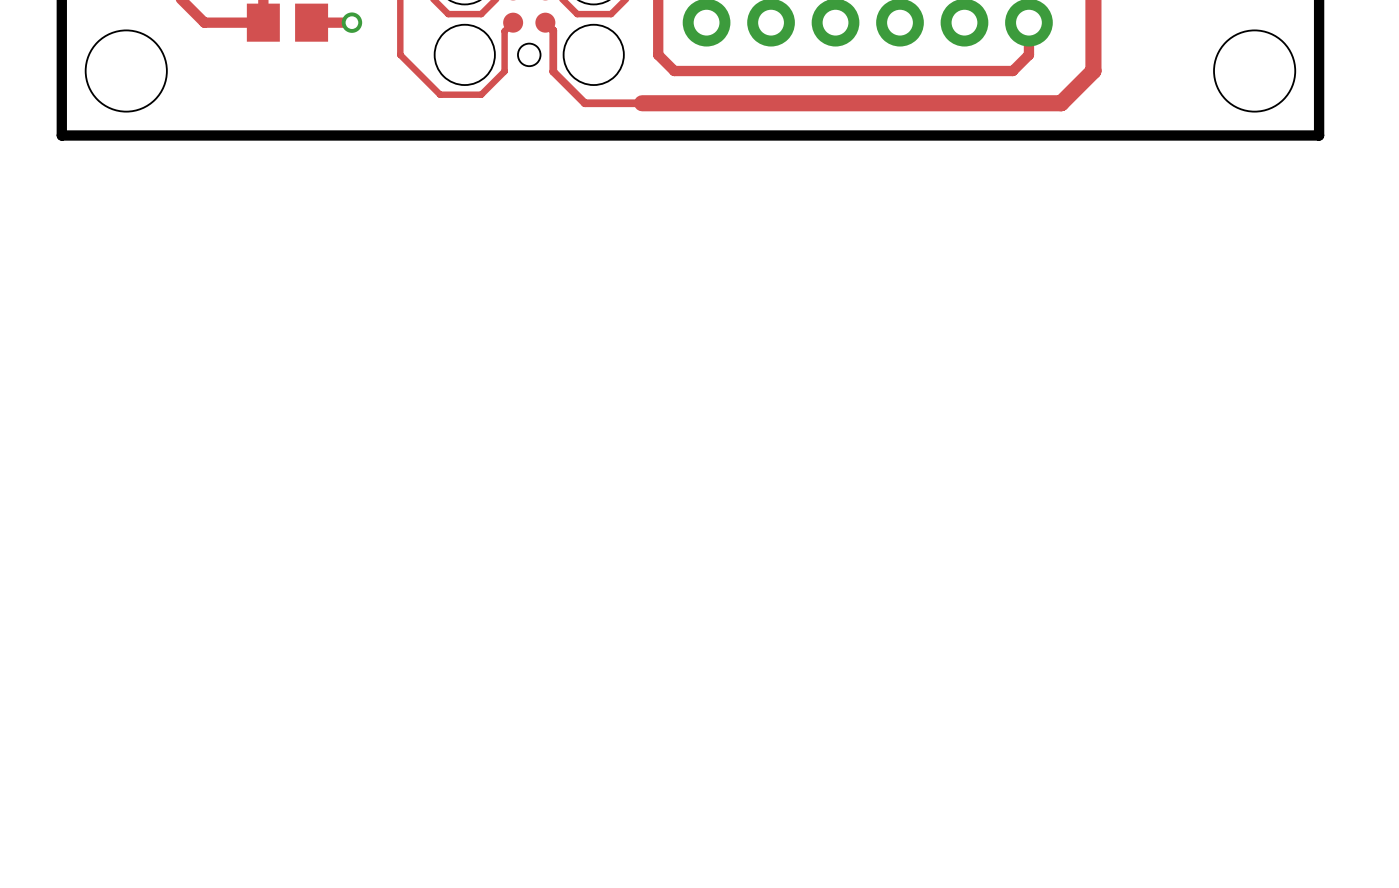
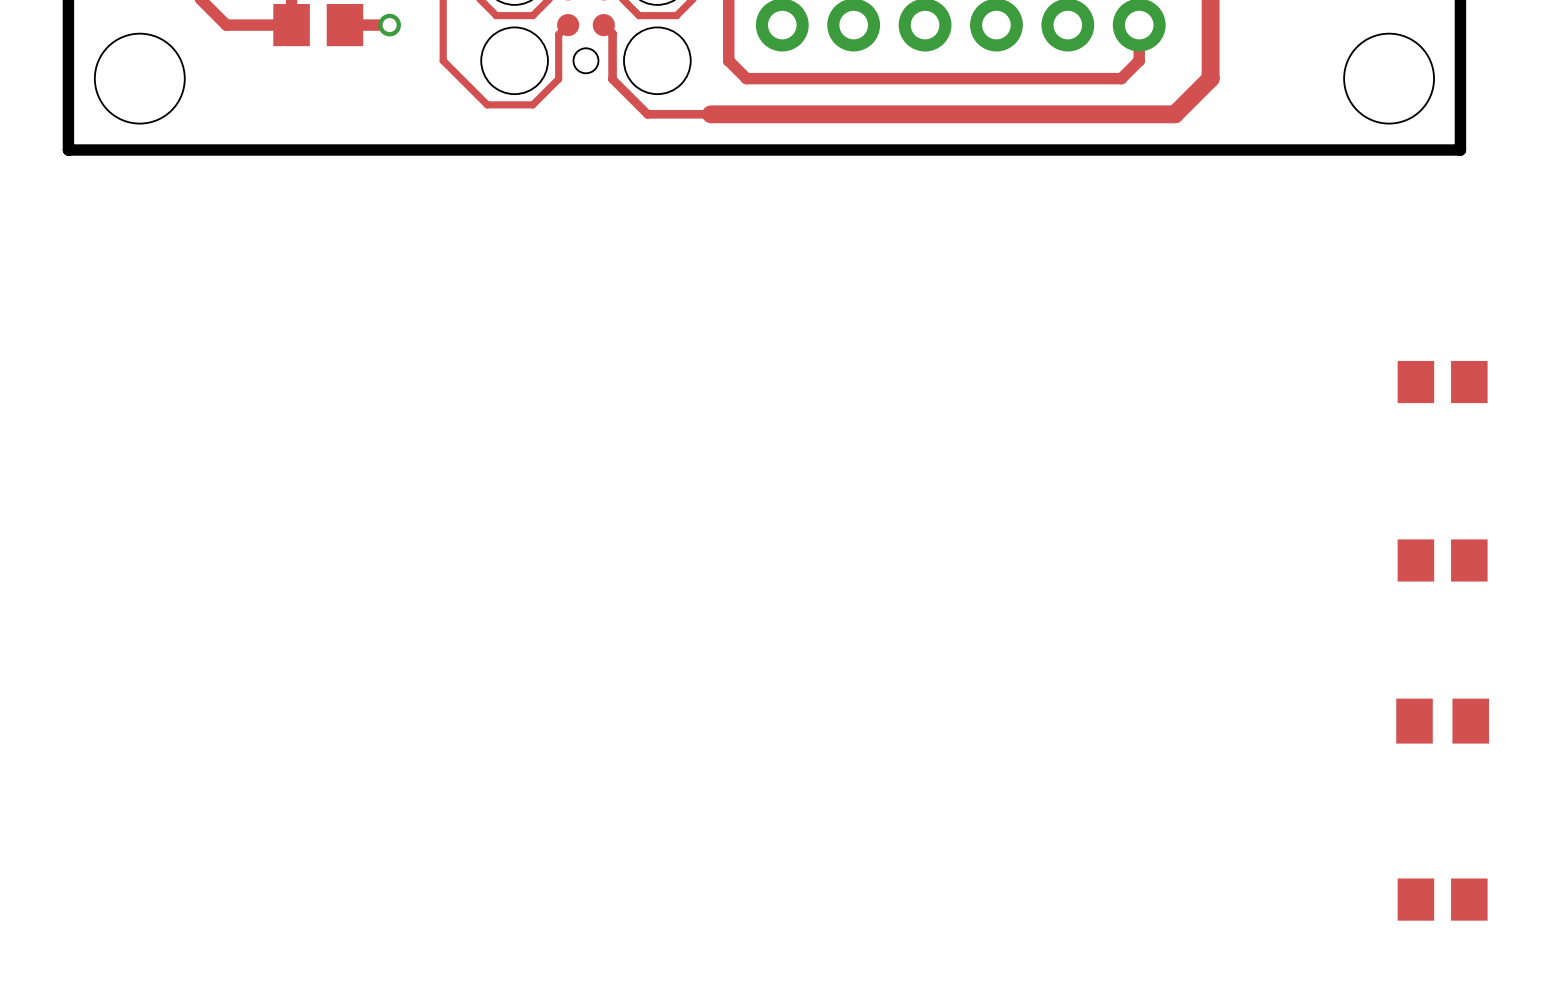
part: none -> (1442, 382)
part: none -> (1442, 560)
part: none -> (1442, 721)
part: none -> (1442, 899)

